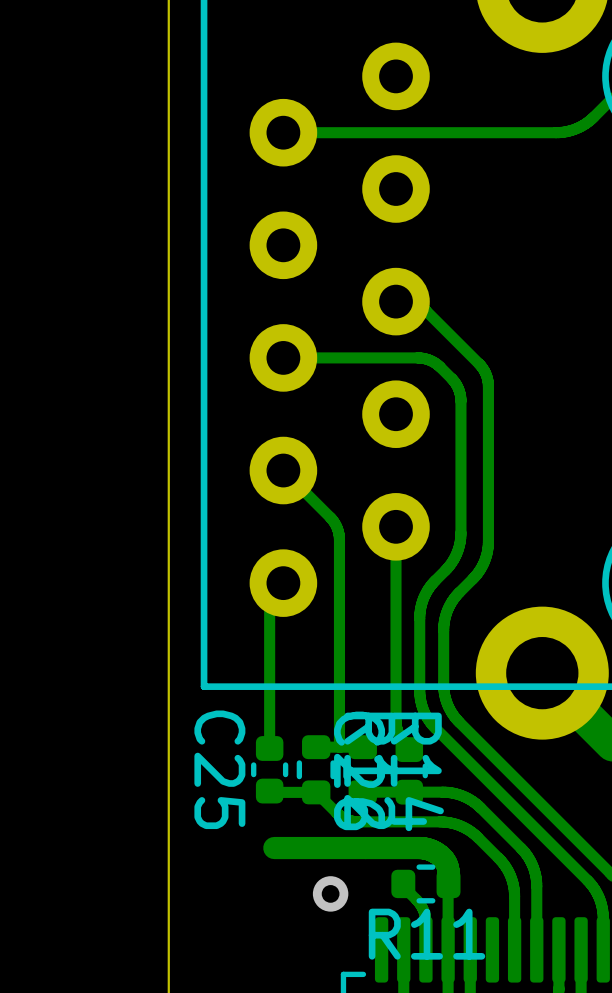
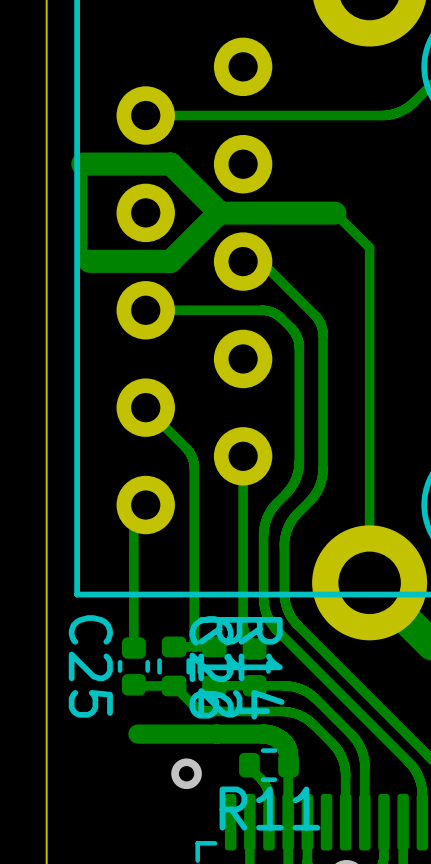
track: none -> (219, 213) (170, 261) (89, 261) (82, 254) (82, 164) (170, 164) (219, 213)
track: none -> (219, 213) (334, 213) (369, 247) (369, 582)

